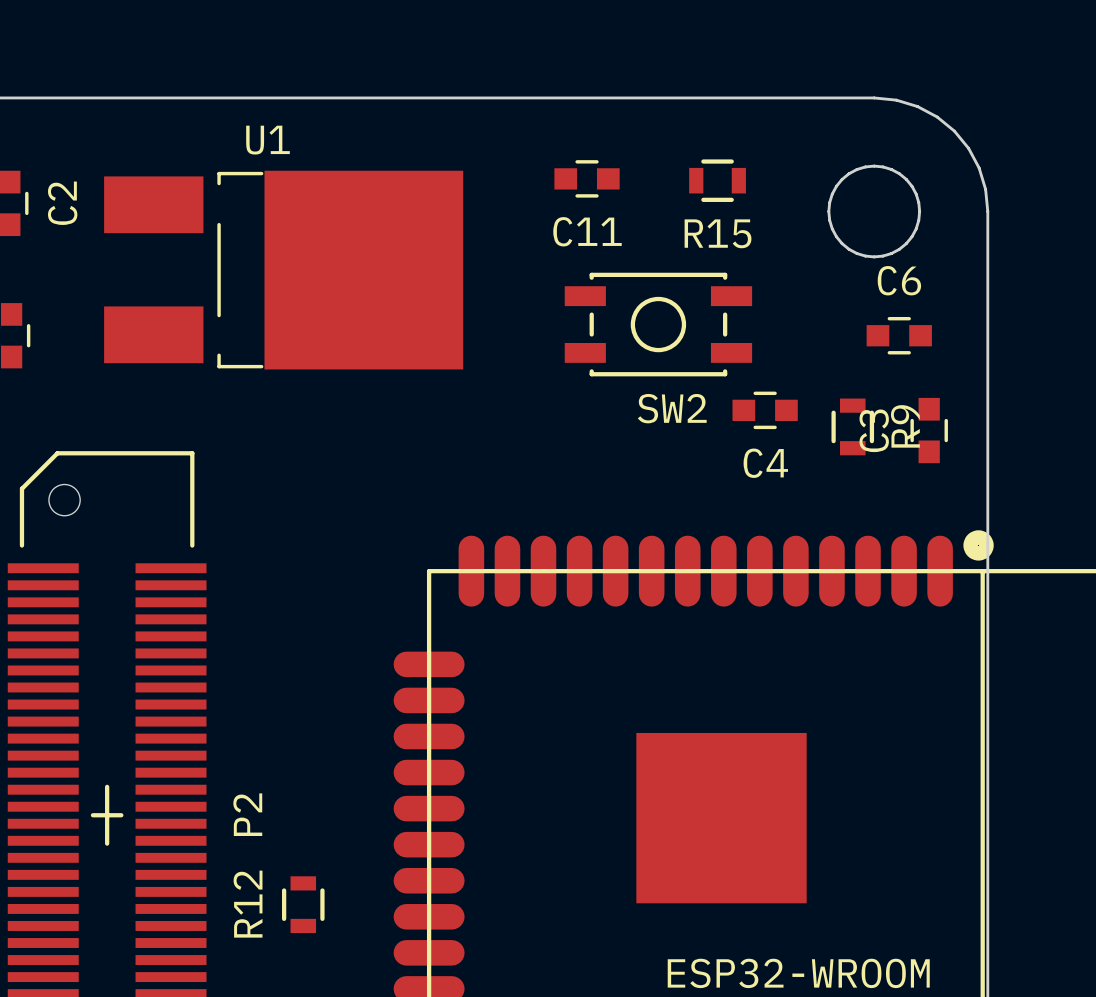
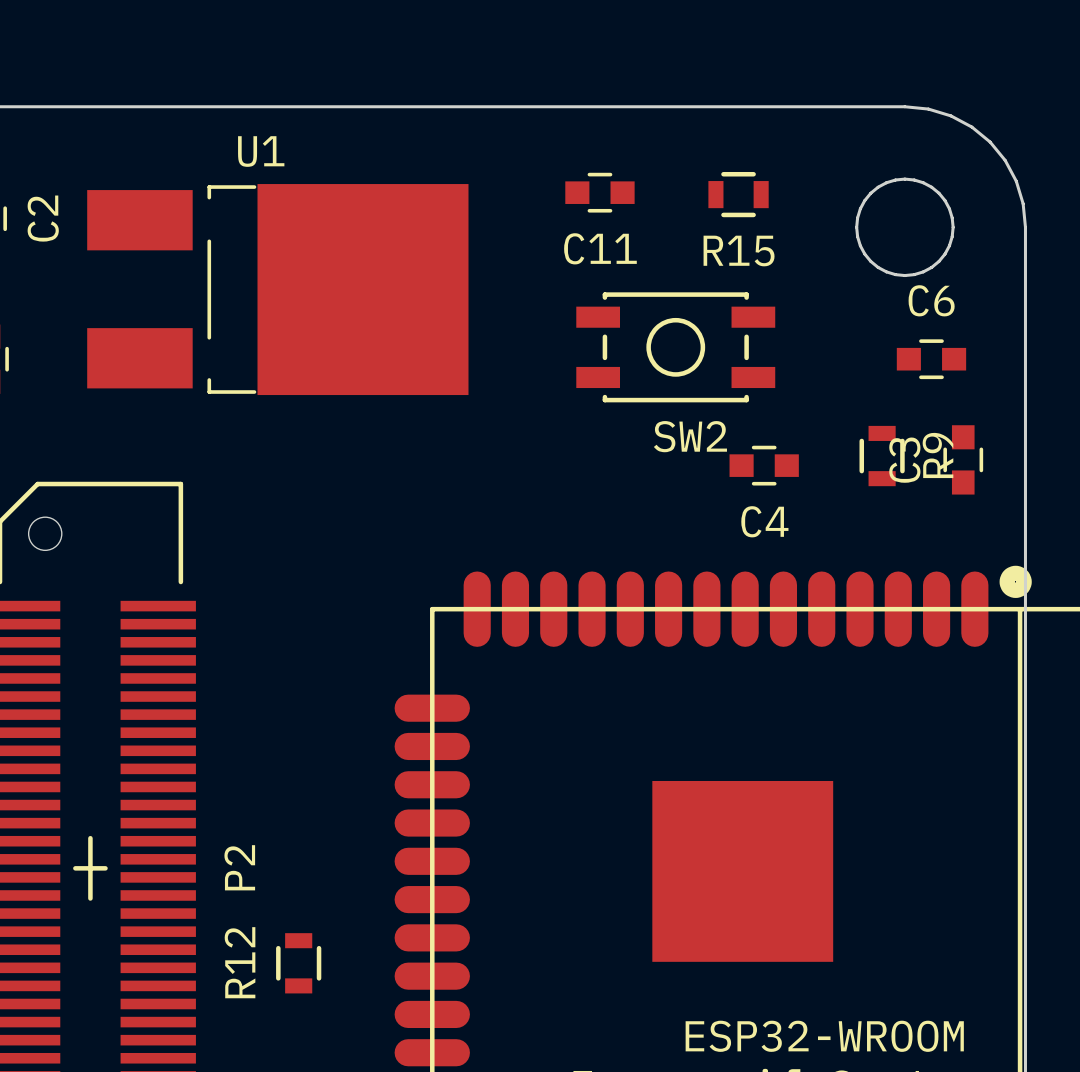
C4 position: (765, 410) -> (764, 465)

